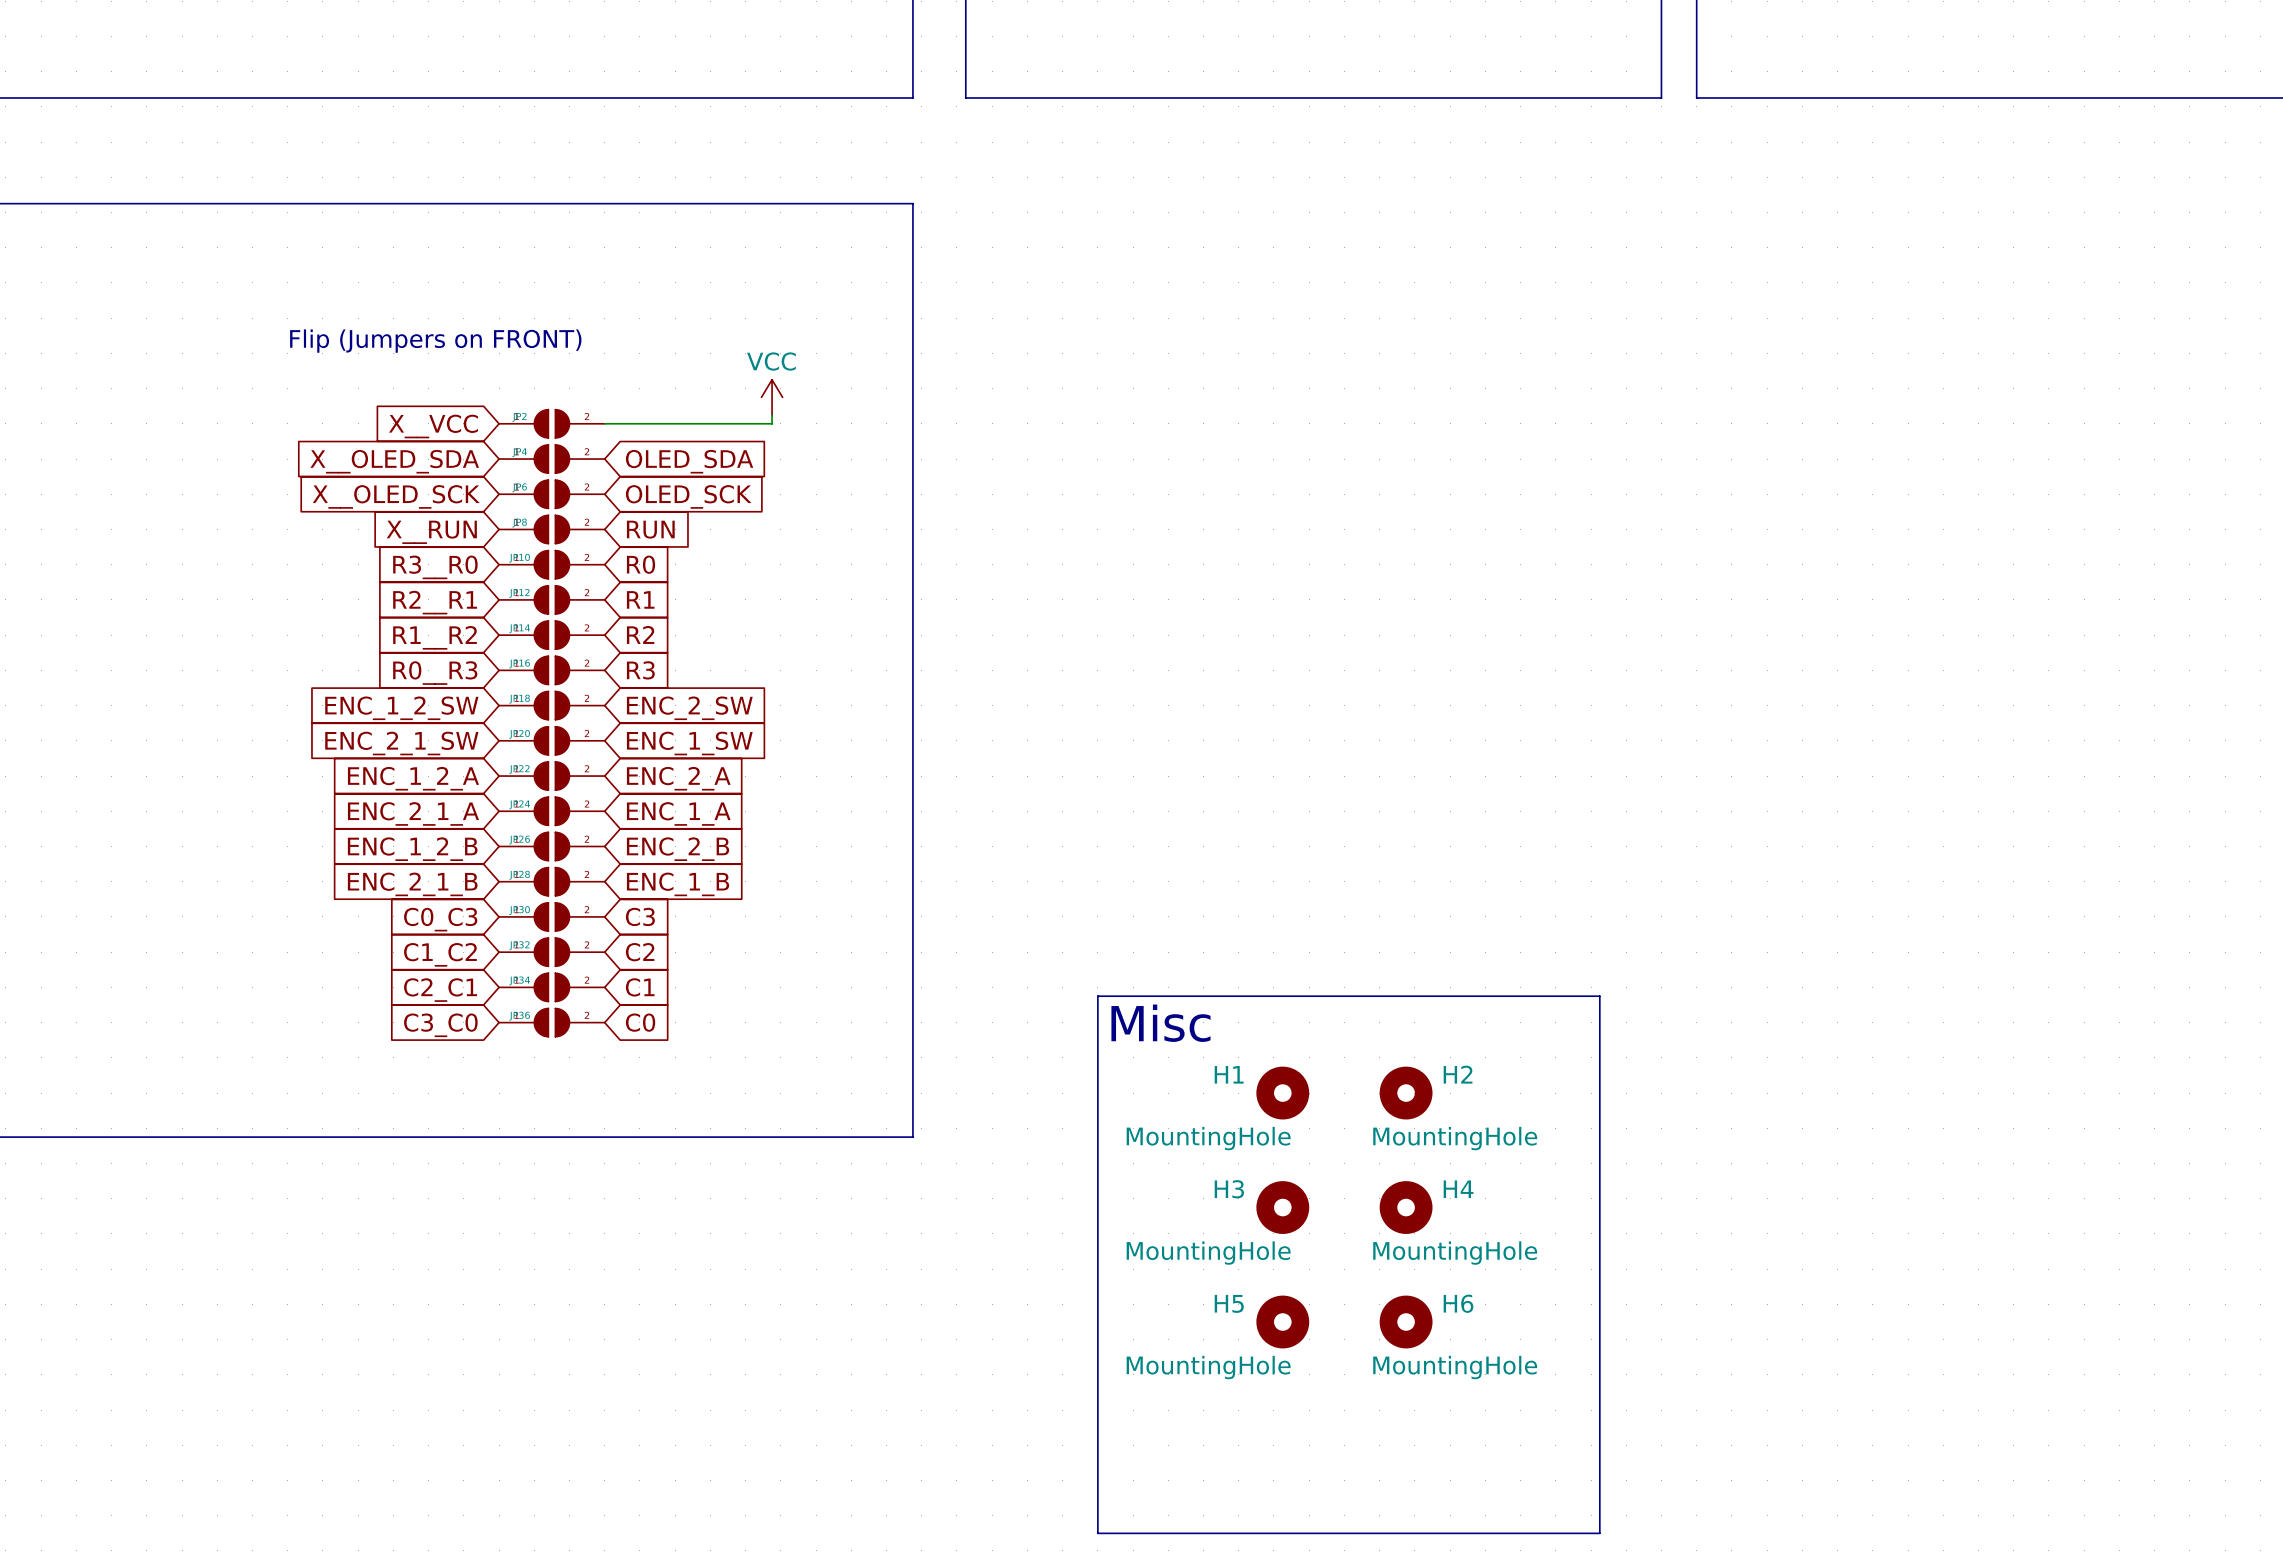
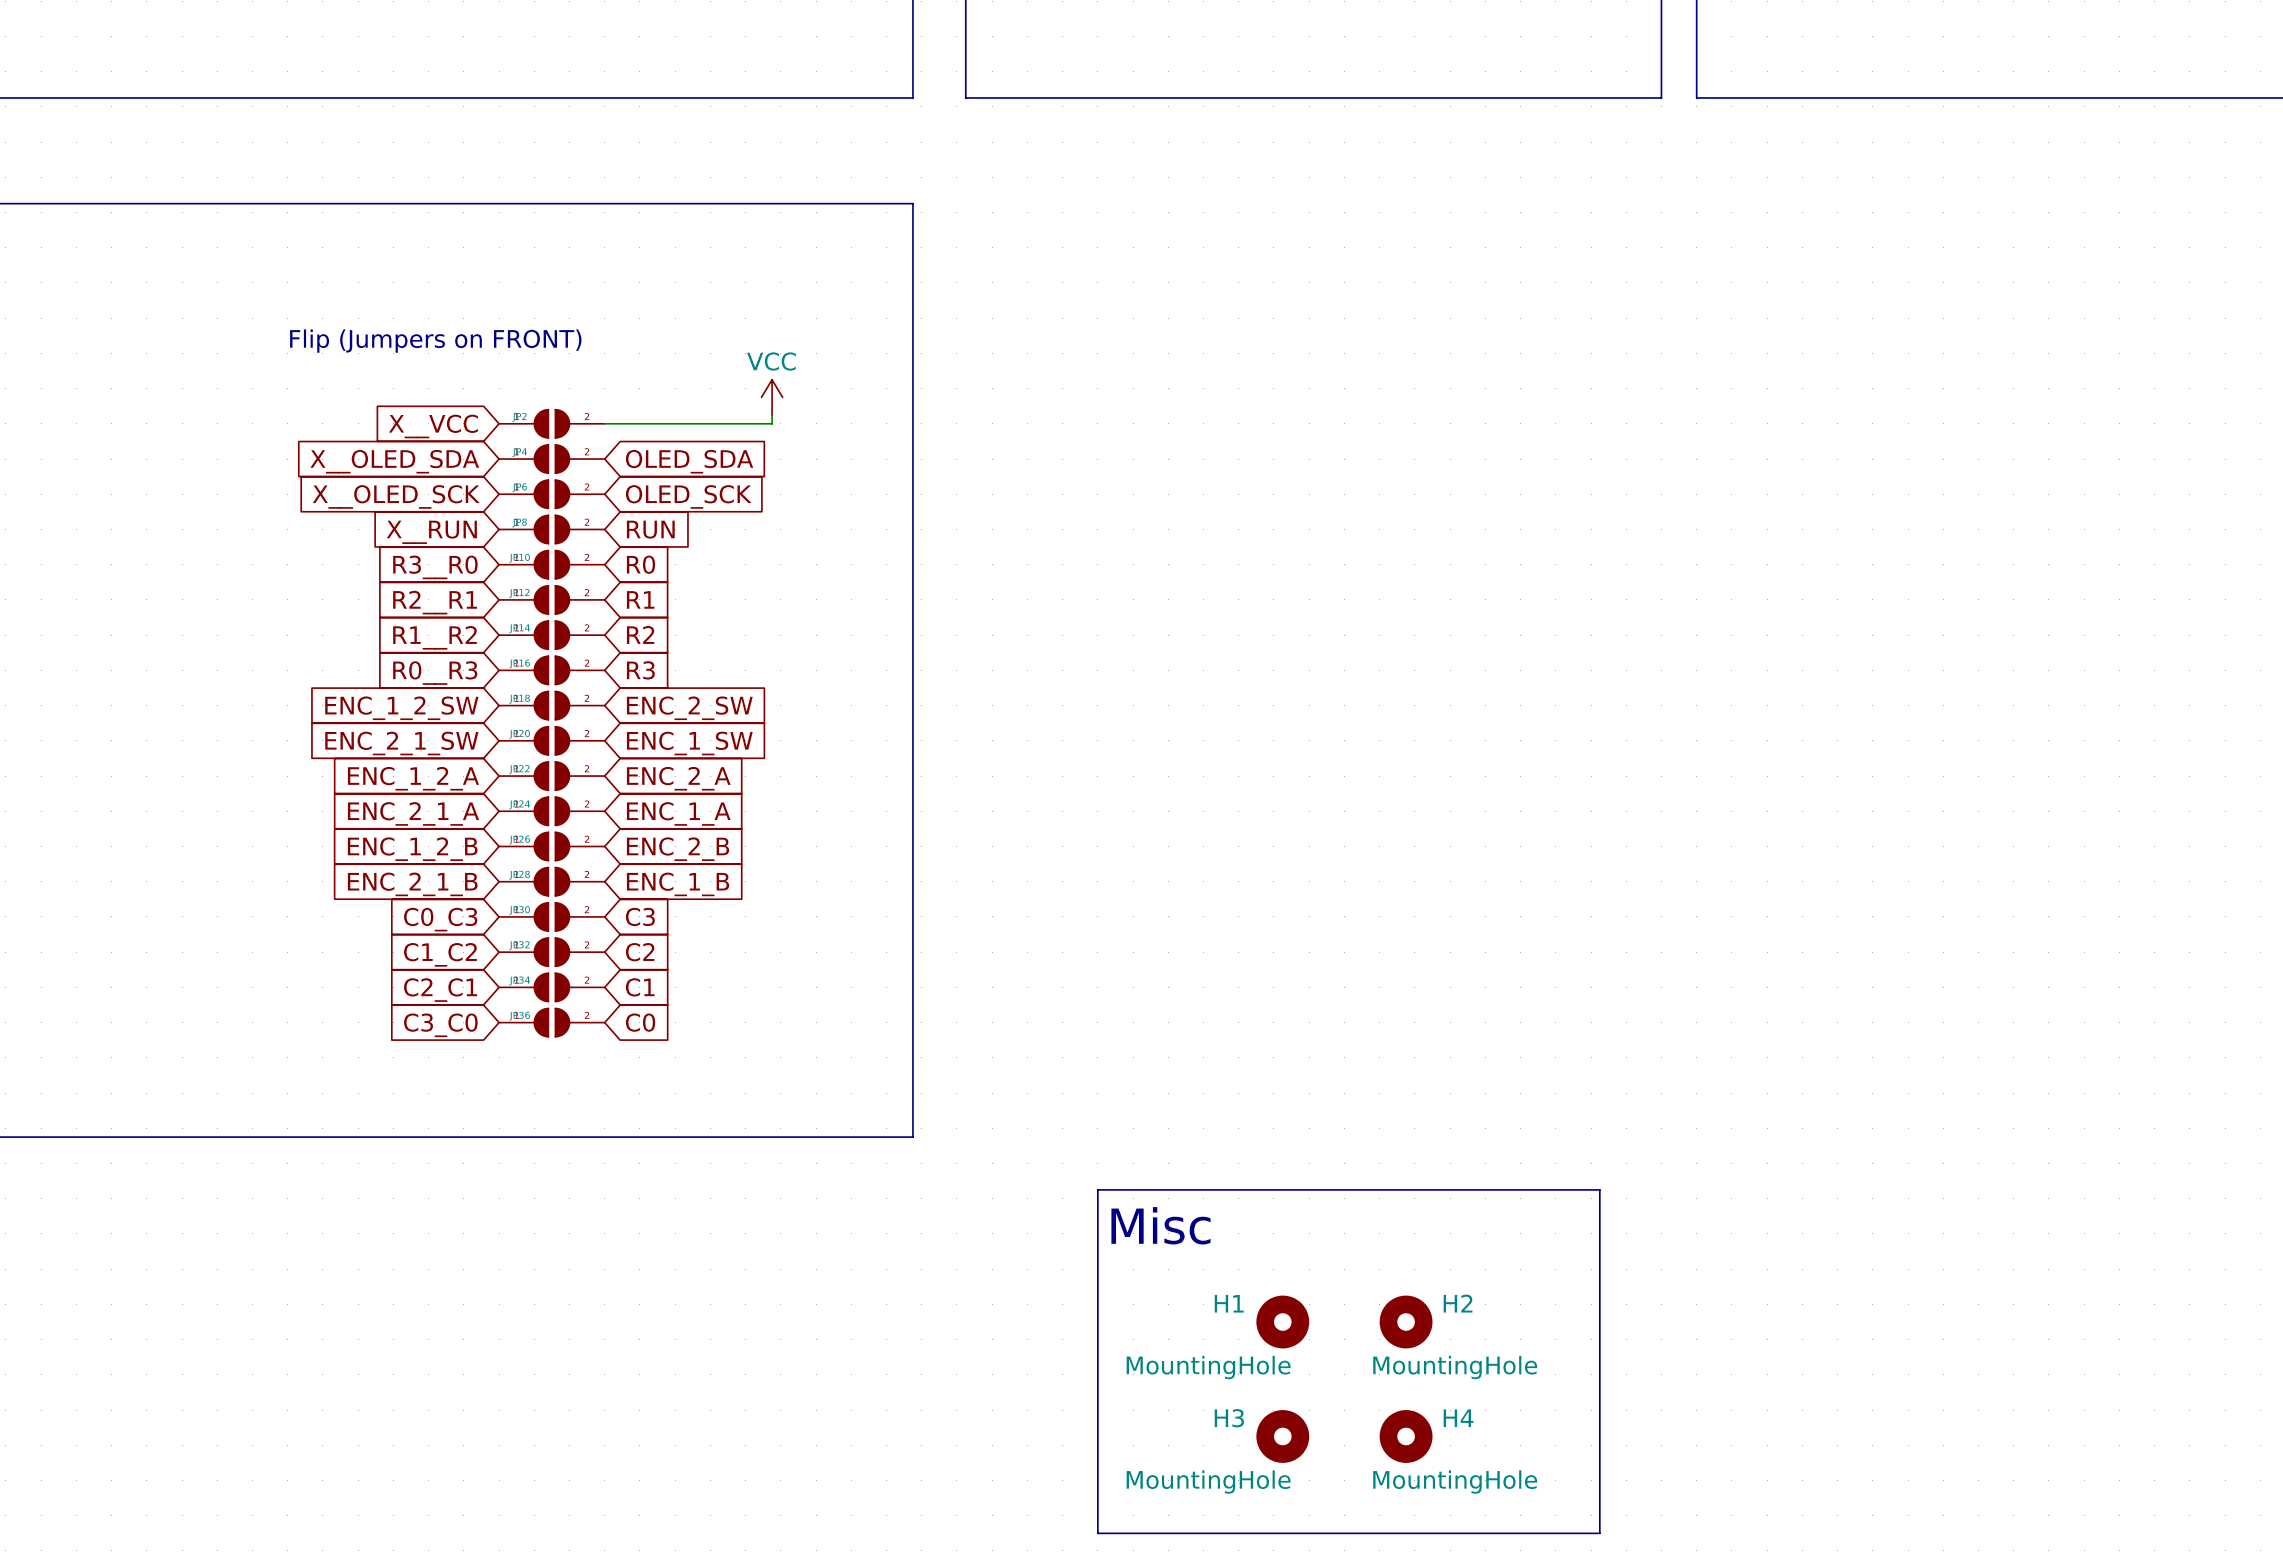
text position: Misc (1160, 1023) -> Misc (1160, 1225)
H1: MountingHole (1282, 1093) -> none
H2: MountingHole (1406, 1093) -> none
line: (1097, 1189) (1097, 996) (1599, 996) (1599, 1189) -> (1097, 1189) (1599, 1189)
H3 position: (1282, 1207) -> (1282, 1436)
H4 position: (1406, 1207) -> (1406, 1436)
H5 name: H5 (1229, 1303) -> H1 (1229, 1303)
H6 name: H6 (1458, 1303) -> H2 (1458, 1303)

